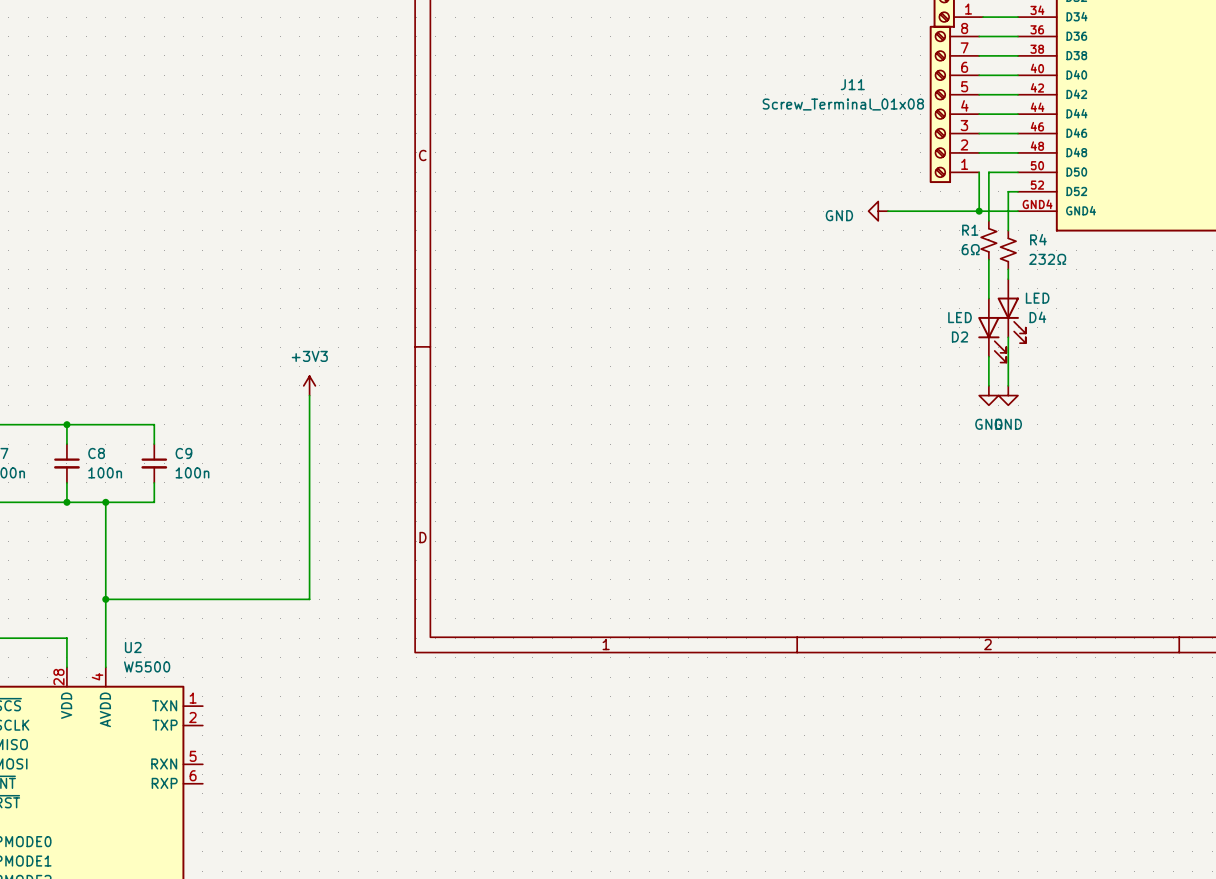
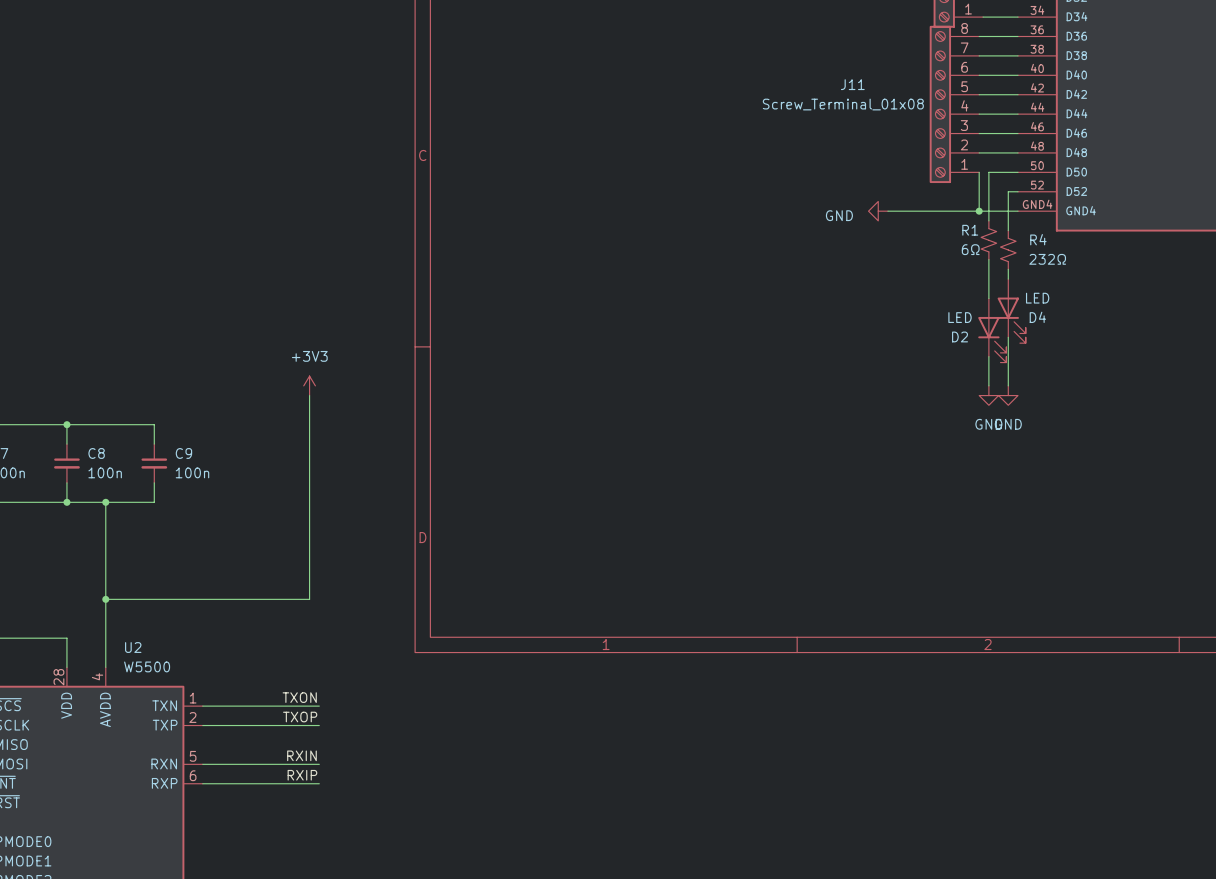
label: none -> TXON (299, 697)
wire: none -> (202, 706) (319, 706)
label: none -> TXOP (300, 717)
wire: none -> (202, 725) (319, 725)
label: none -> RXIN (301, 755)
wire: none -> (202, 764) (319, 764)
label: none -> RXIP (302, 775)
wire: none -> (202, 783) (319, 783)

